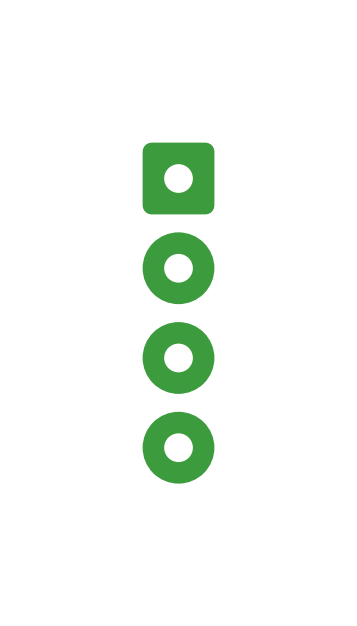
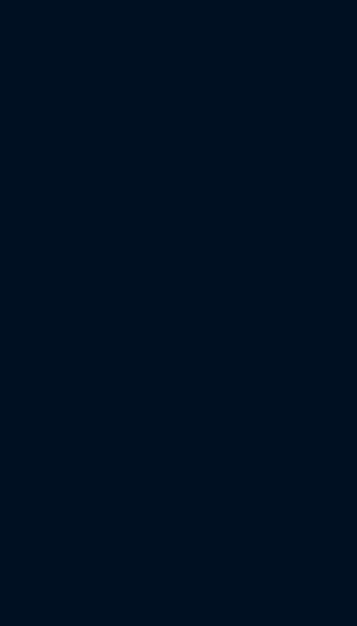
part: (178, 313) -> none

